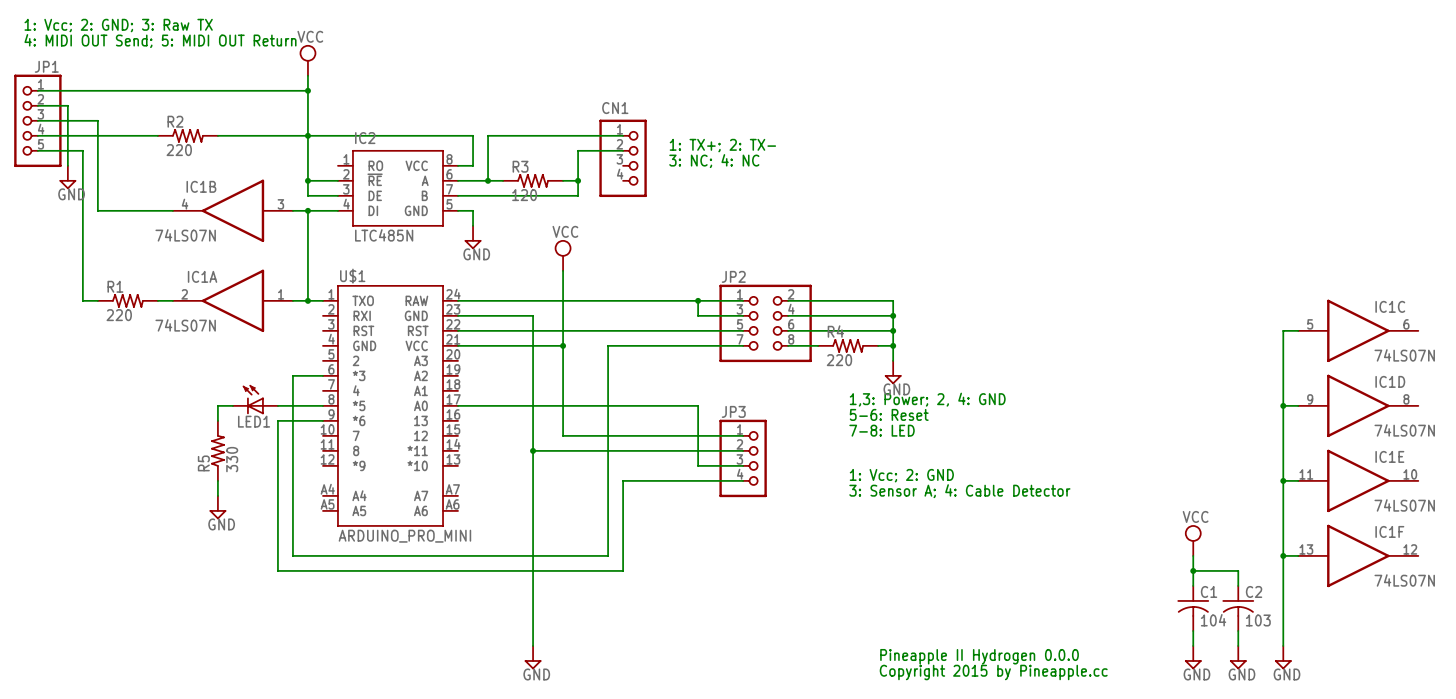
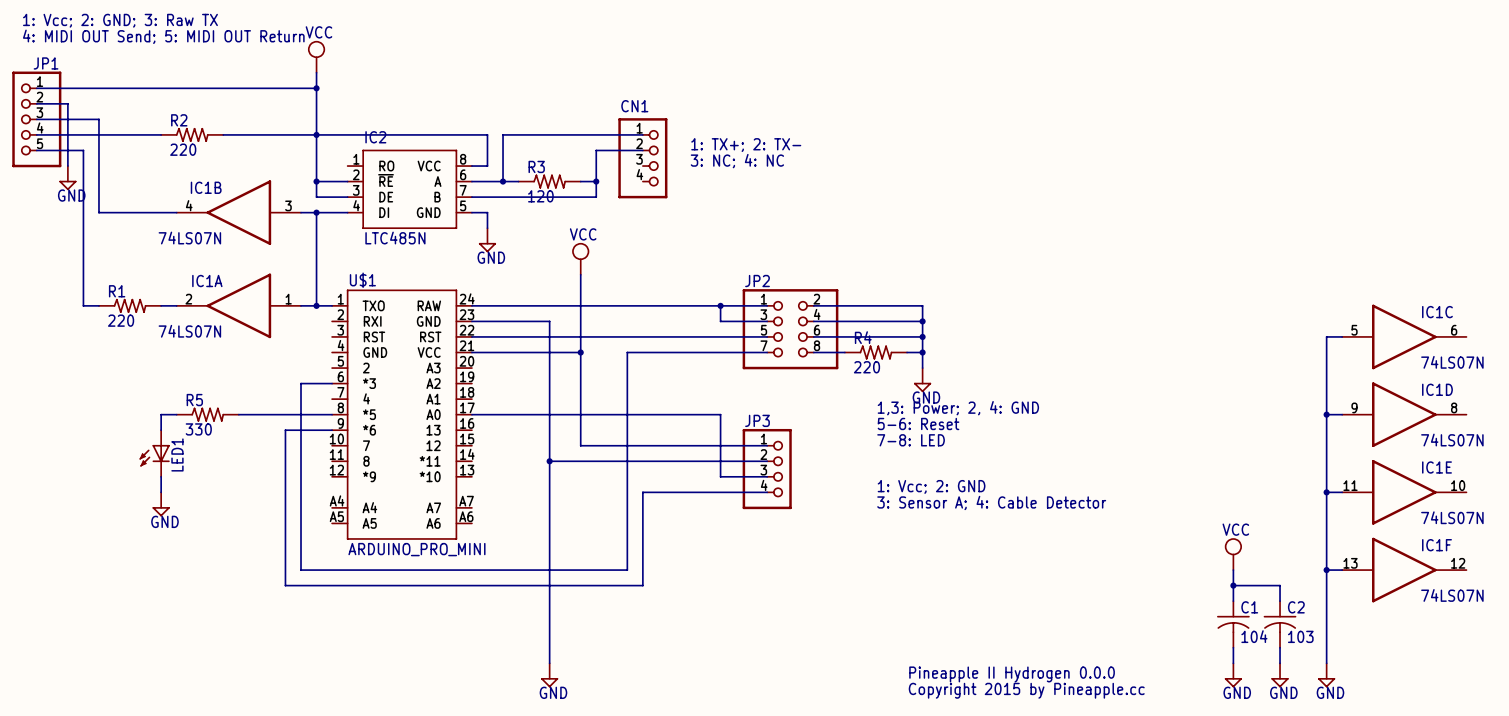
LED1 rotation: 0° (253, 399) -> 90° counterclockwise (154, 455)
LED1 position: (255, 399) -> (154, 453)
wire: none -> (176, 414) (161, 414) (161, 430)
R5 rotation: 0° (217, 450) -> 90° clockwise (207, 414)
R5 position: (217, 450) -> (207, 414)
wire: (217, 480) (217, 495) -> (161, 476) (161, 492)
power symbol position: GND (217, 507) -> GND (161, 504)

